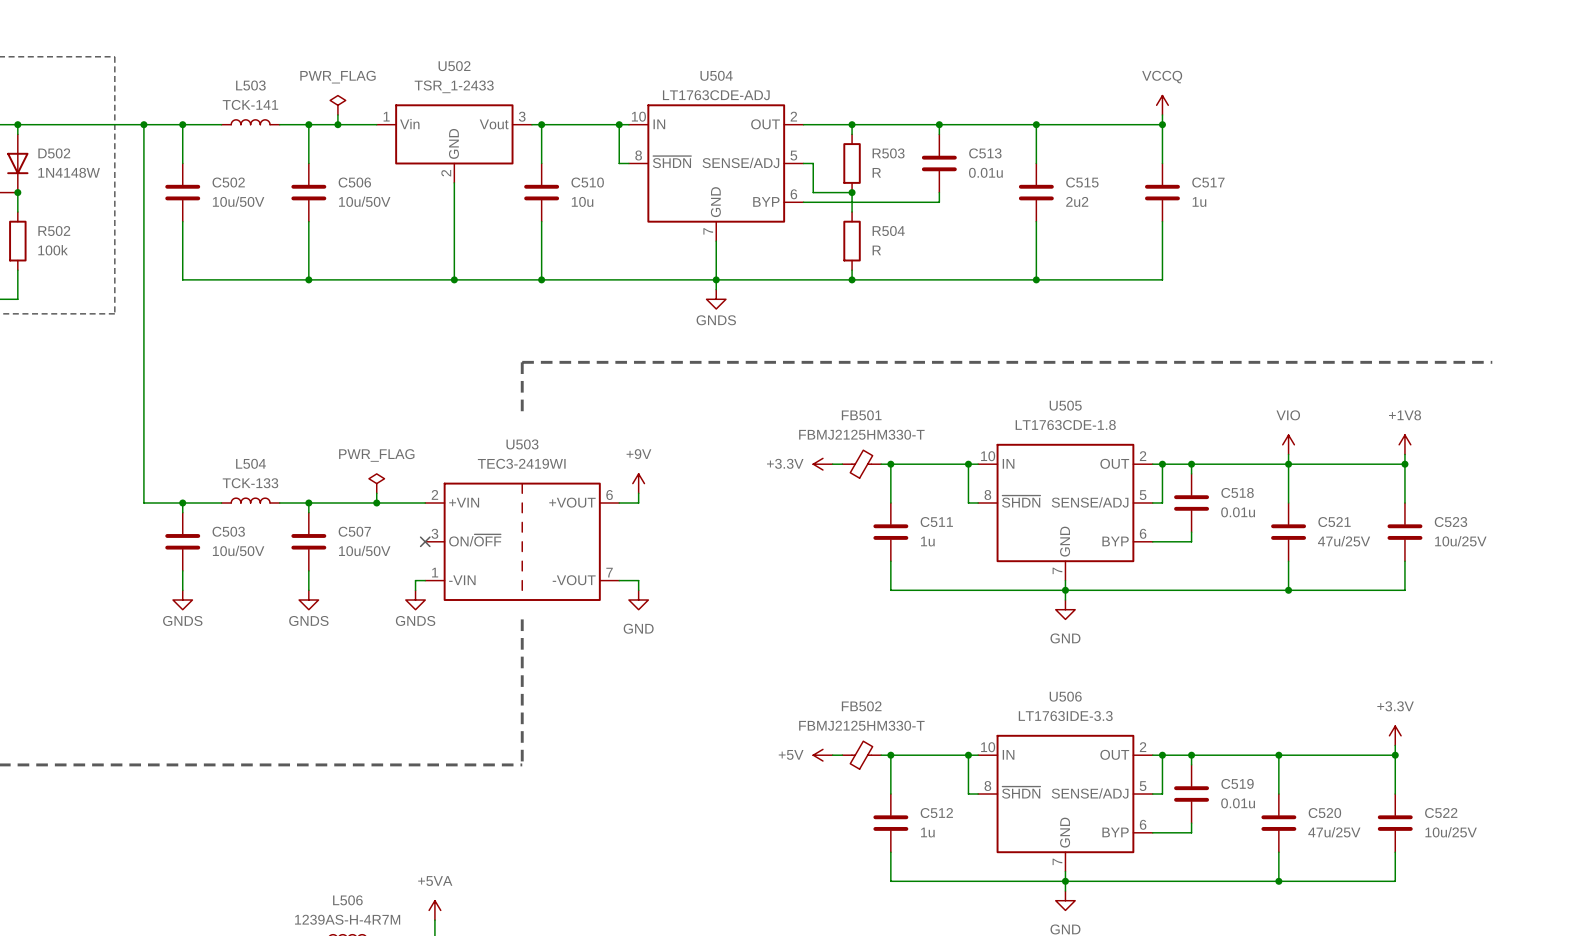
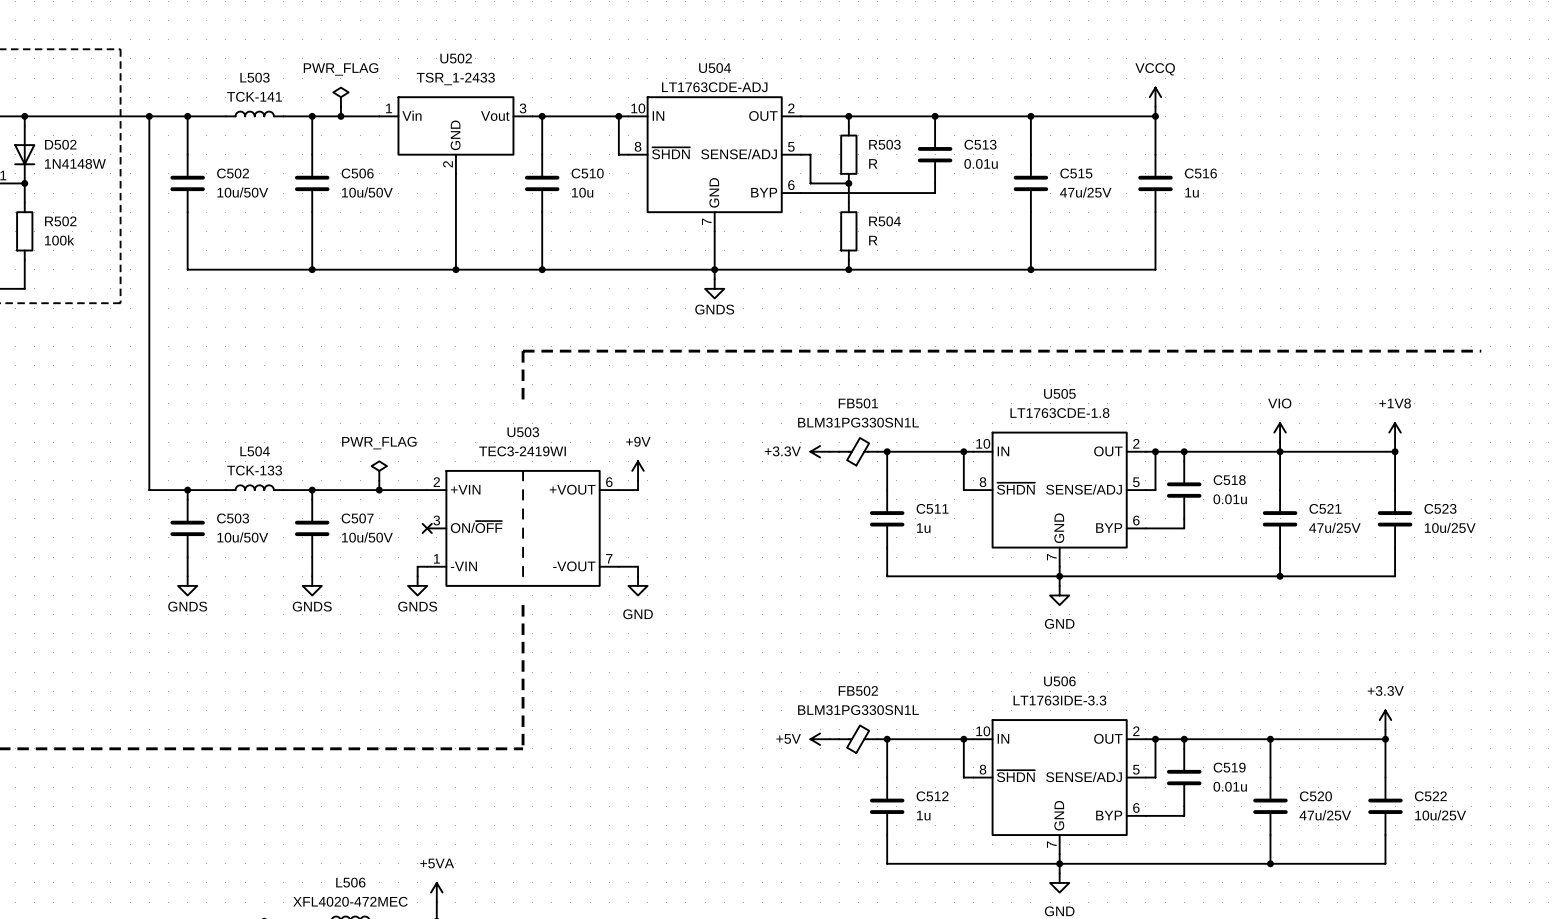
C517 name: C517 (1208, 182) -> C516 (1200, 173)
C515 value: 2u2 (1077, 201) -> 47u/25V (1085, 192)
FB501 value: FBMJ2125HM330-T (861, 434) -> BLM31PG330SN1L (858, 422)
FB502 value: FBMJ2125HM330-T (861, 725) -> BLM31PG330SN1L (858, 710)
L506 value: 1239AS-H-4R7M (347, 919) -> XFL4020-472MEC (350, 901)

